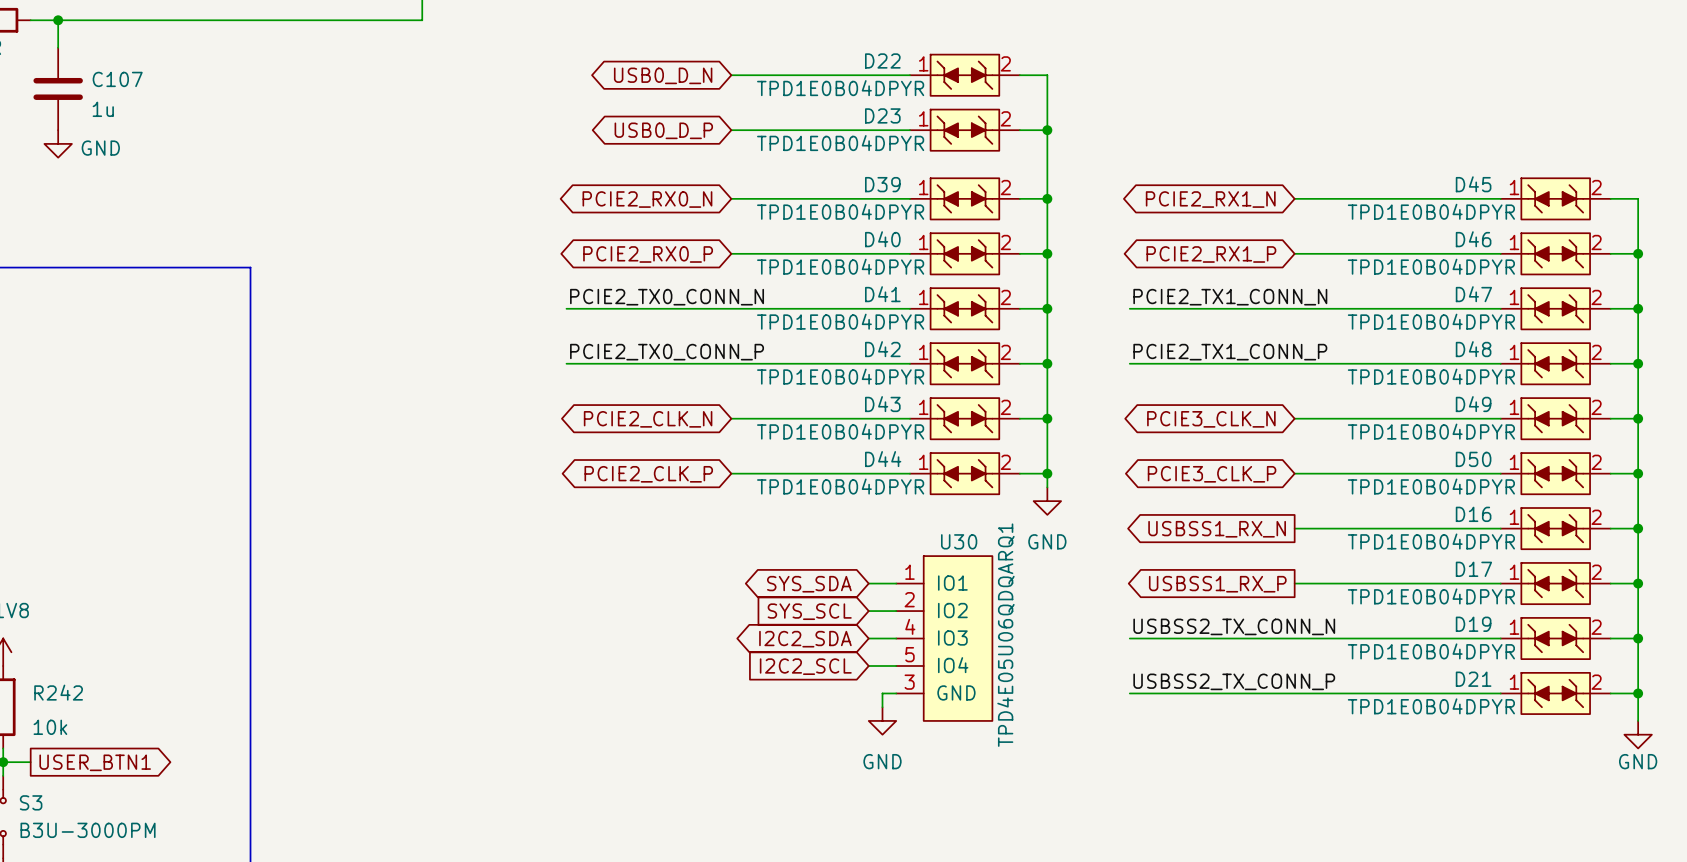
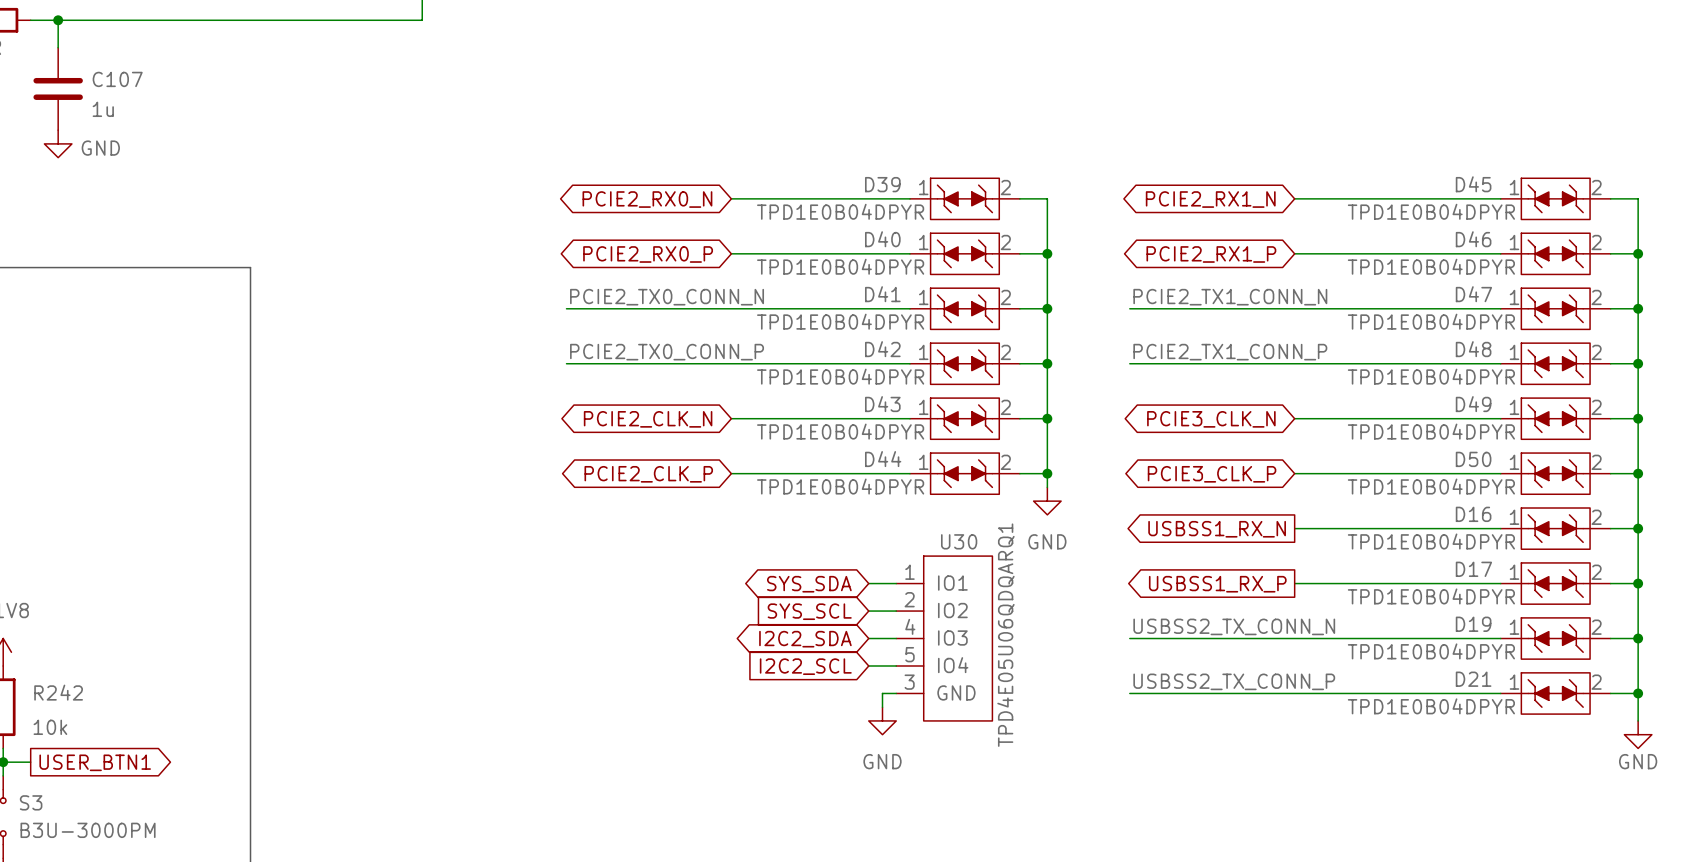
global label: USB0_D_N (663, 75) -> none
wire: (731, 75) (909, 75) -> none
D22: TPD1E0B04DPYR (964, 75) -> none
wire: (1019, 75) (1047, 75) (1047, 198) -> none
global label: USB0_D_P (663, 130) -> none
wire: (731, 130) (909, 130) -> none
D23: TPD1E0B04DPYR (964, 130) -> none
wire: (1019, 130) (1047, 130) -> none
junction: (1047, 130) -> none
junction: (1047, 198) -> none

